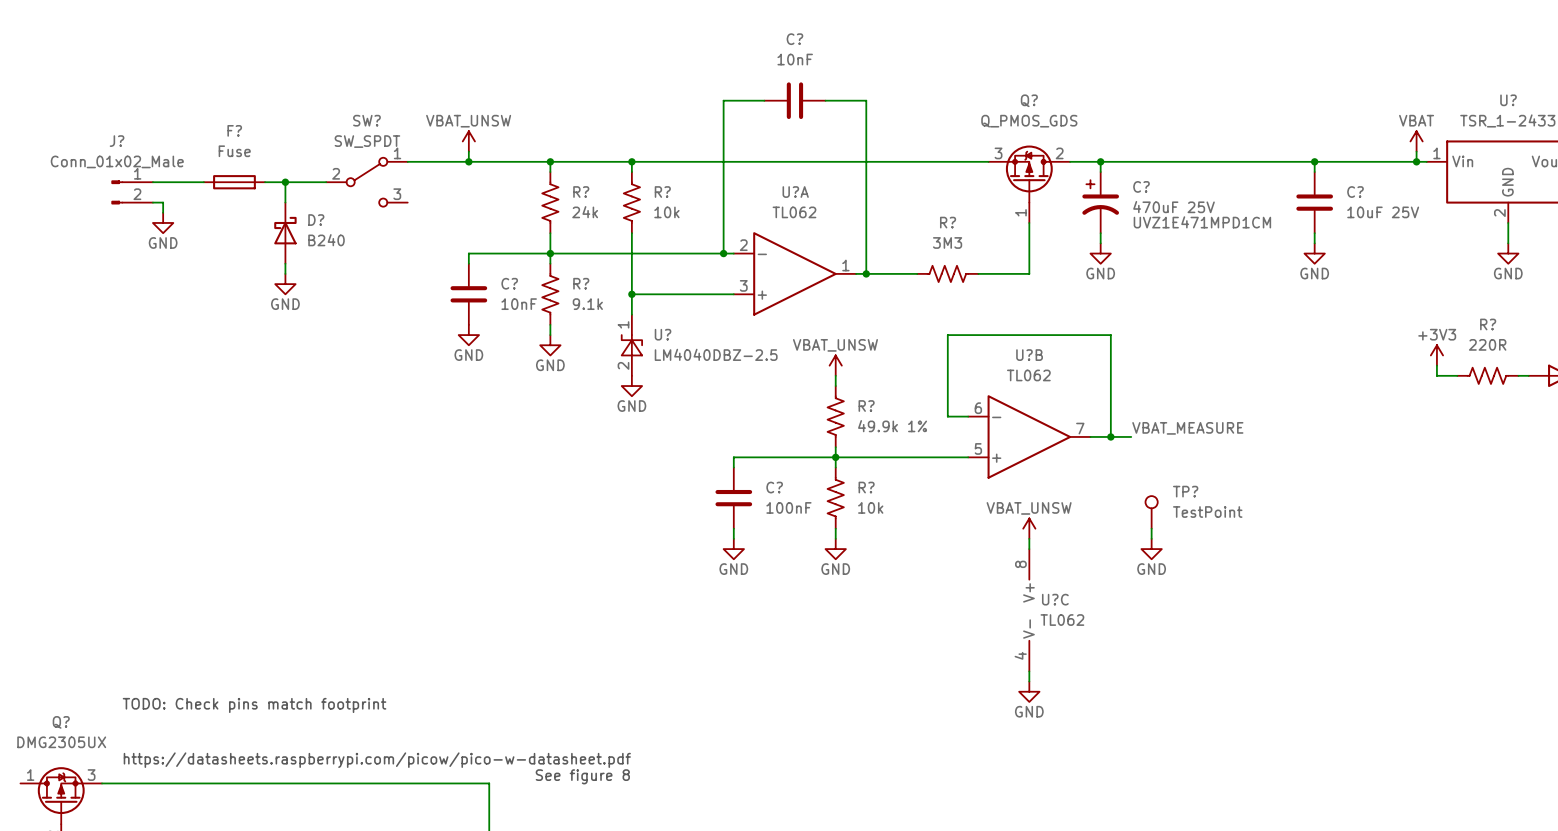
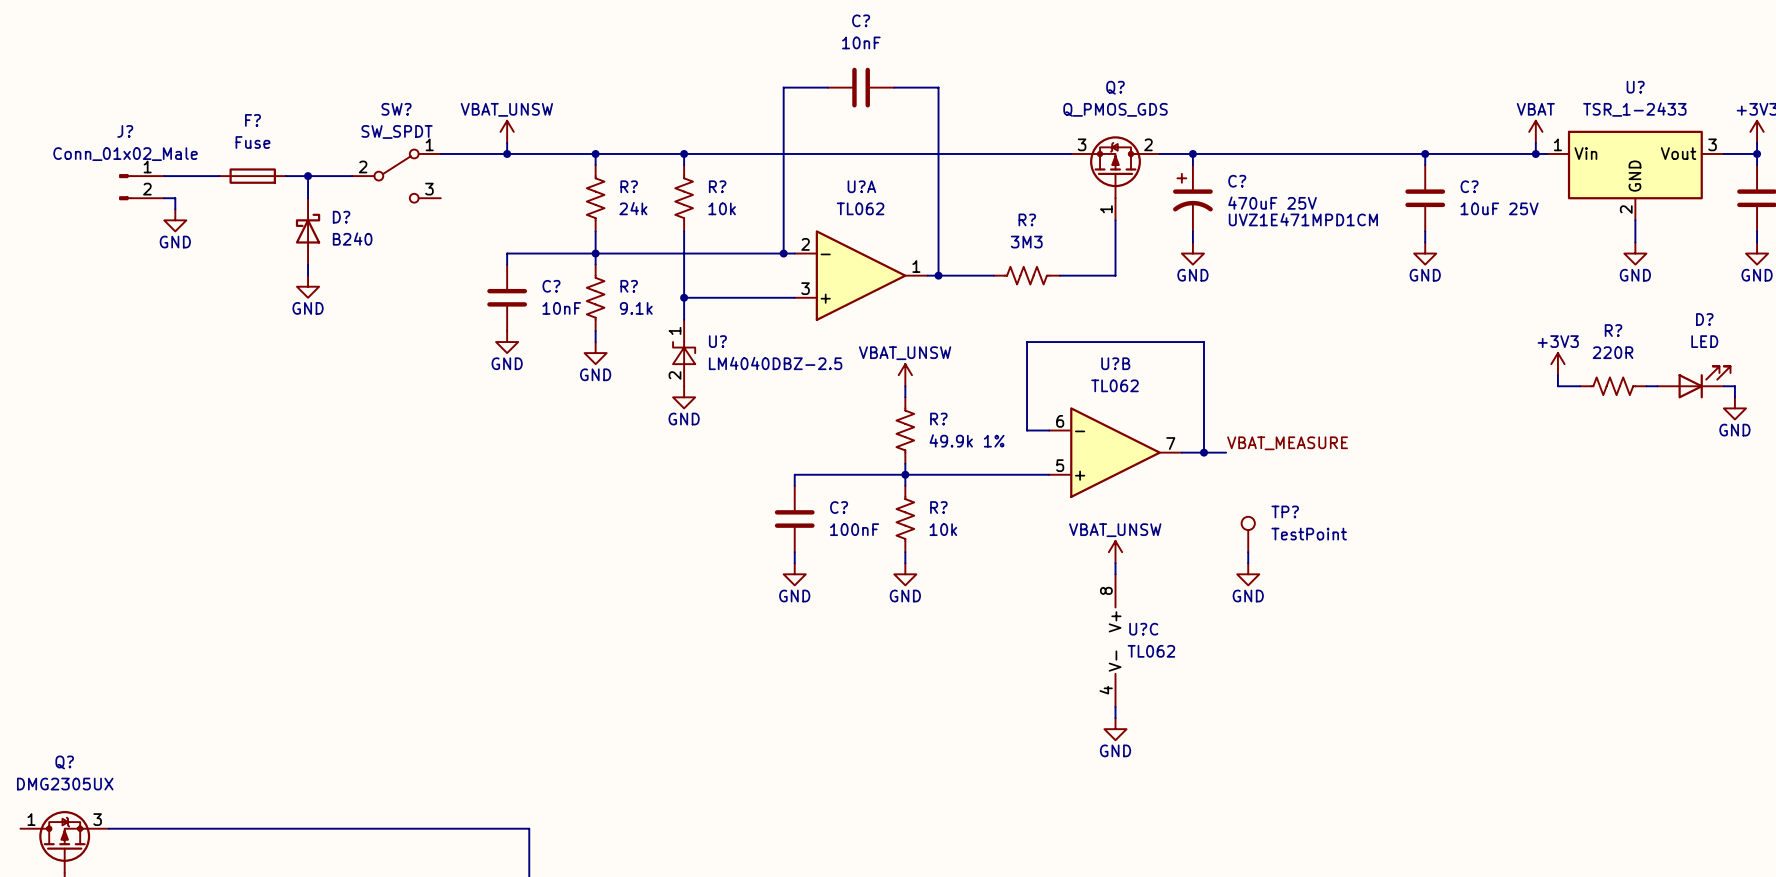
text: TODO: Check pins match footprint (254, 705) -> none
text: https://datasheets.raspberrypi.com/picow/pico-w-datasheet.pdf (377, 760) -> none
text: See figure 8 (582, 776) -> none

